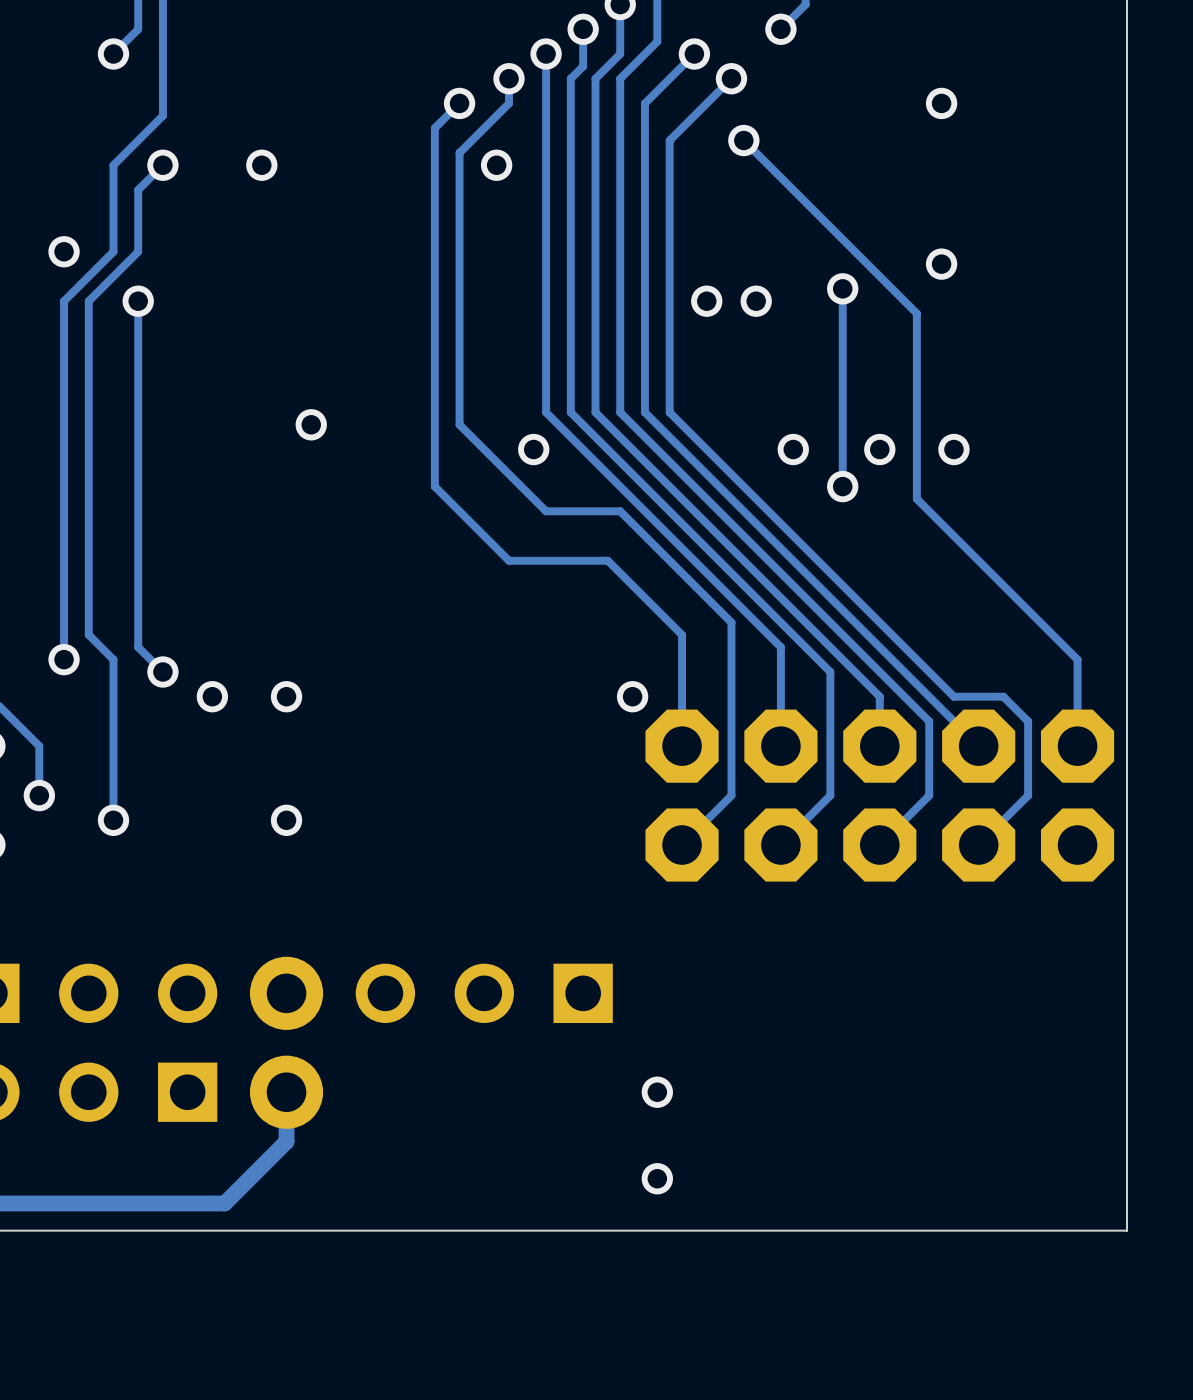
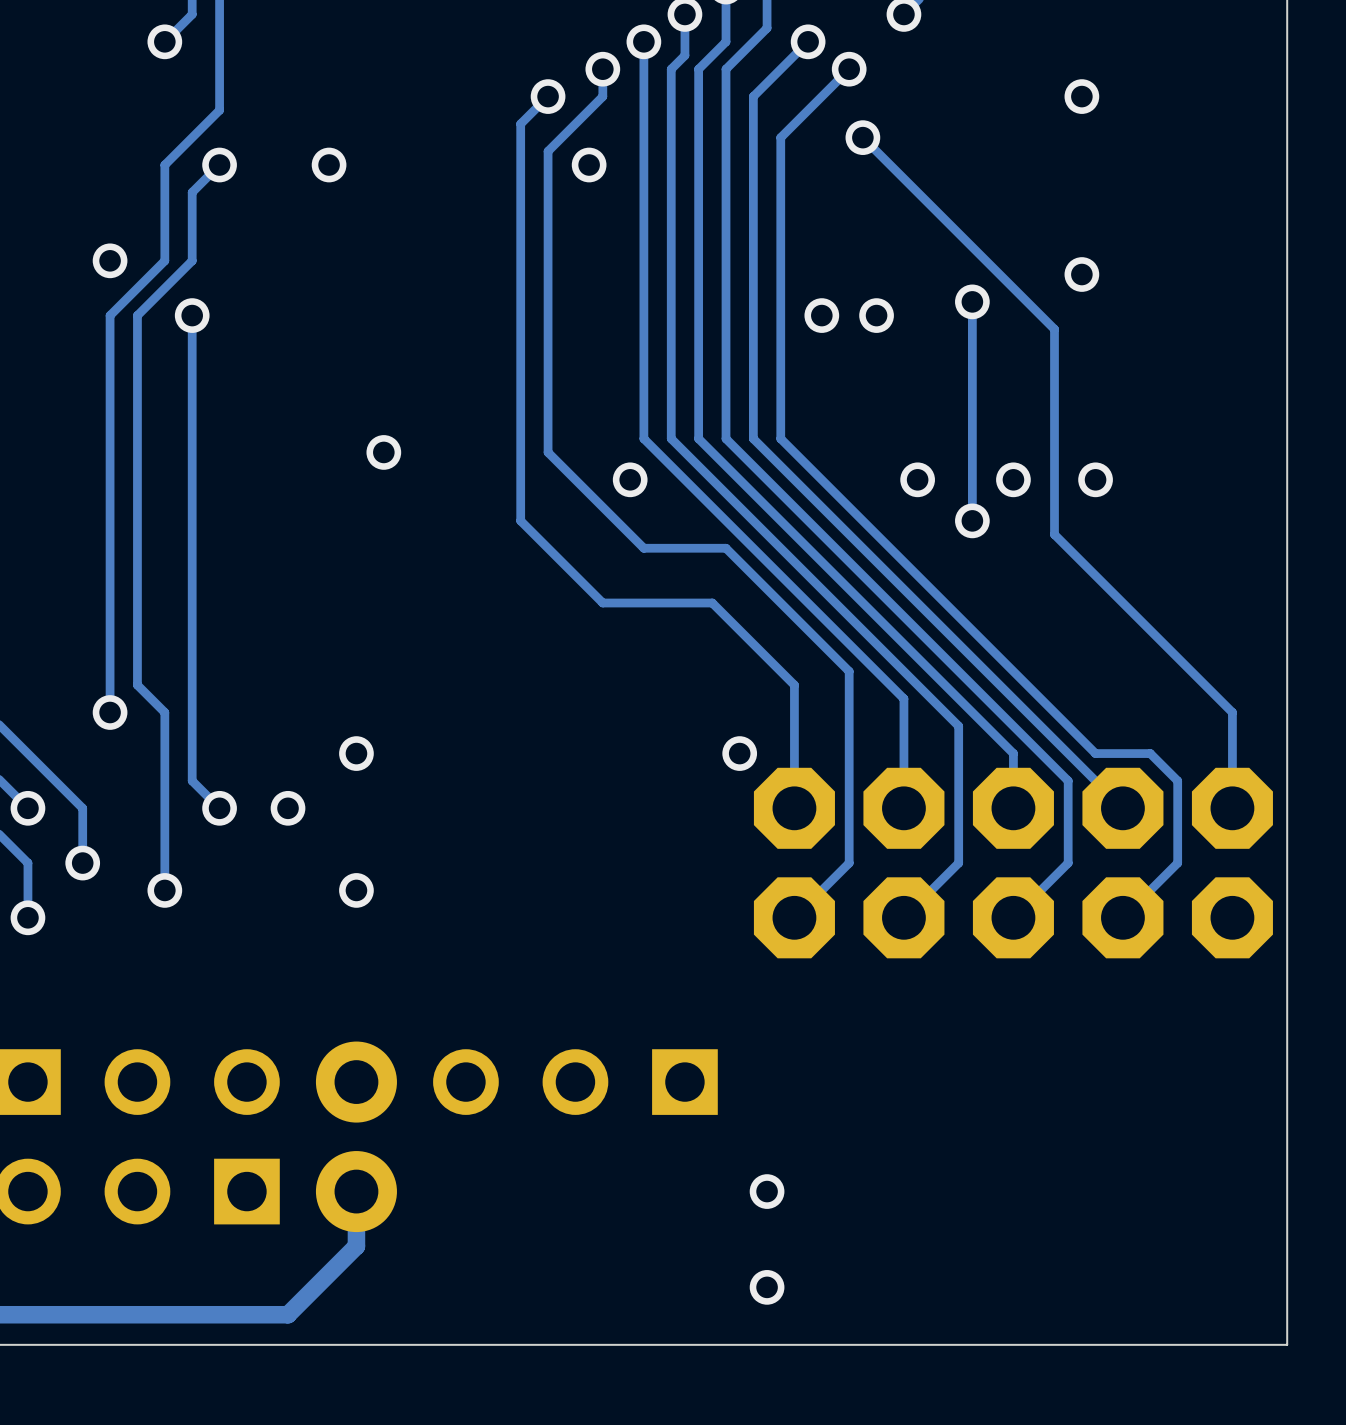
track: (138, 647) (162, 671) -> (192, 698) (192, 780) (219, 808)
via: (162, 671) -> none
via: (212, 696) -> none
via: none -> (219, 808)
via: none -> (288, 808)

